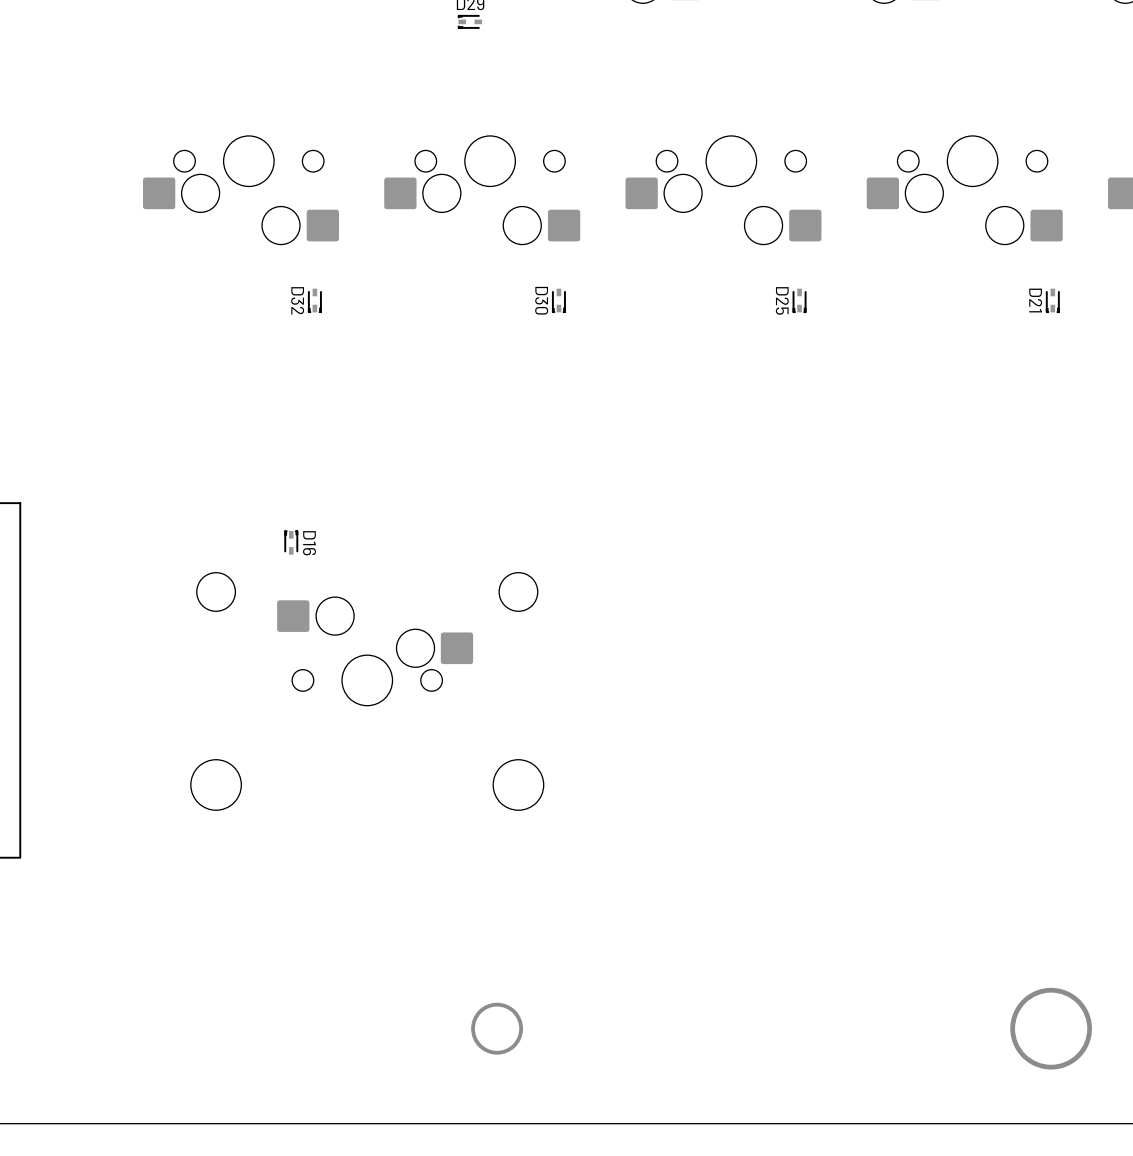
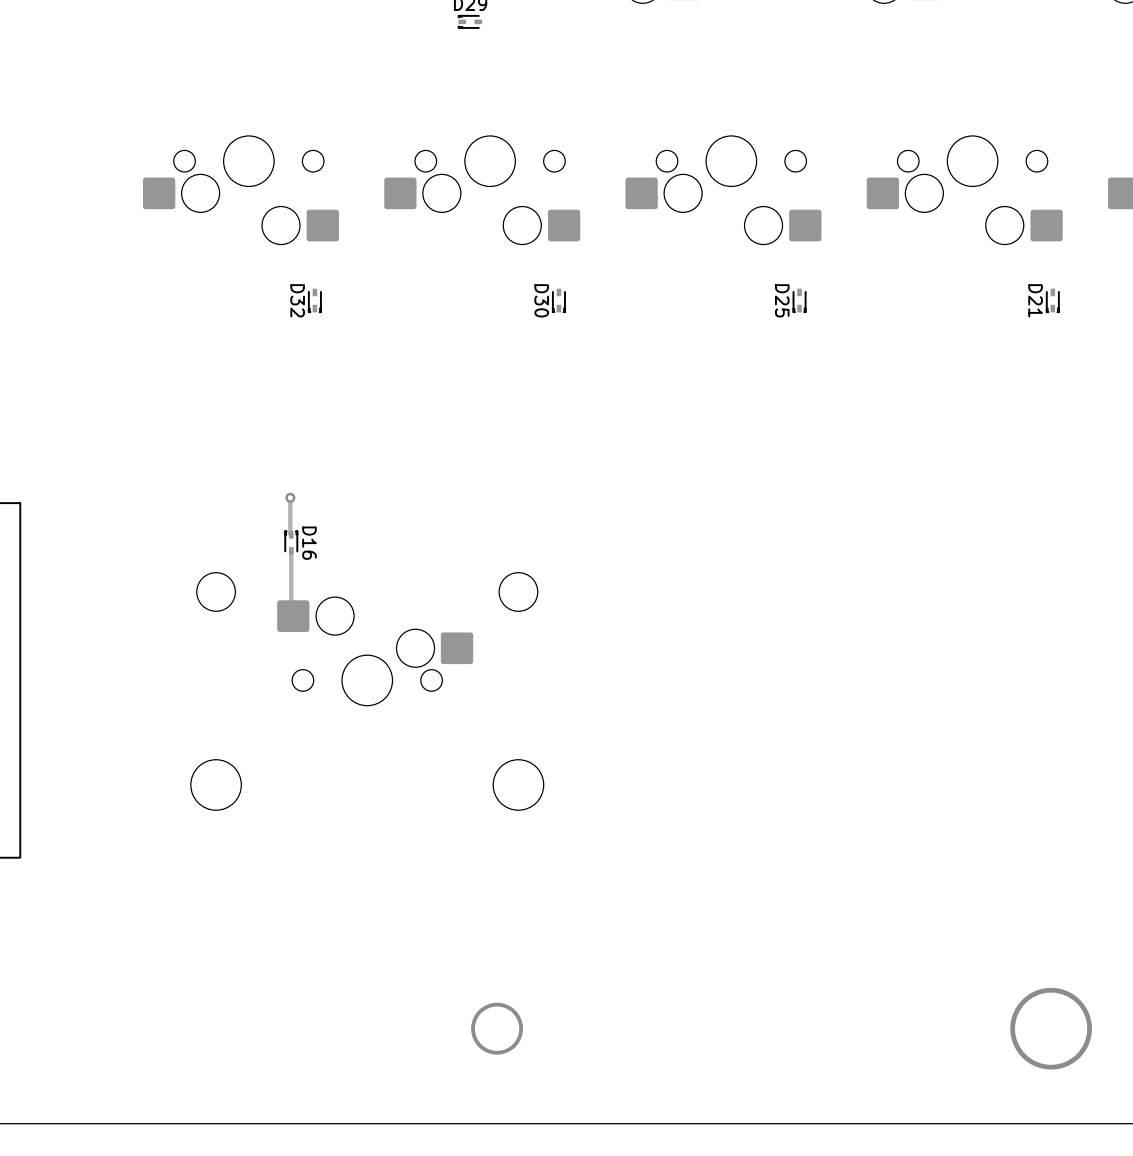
track: none -> (290, 497) (291, 534)
via: none -> (290, 497)
track: none -> (291, 550) (291, 614) (293, 616)

